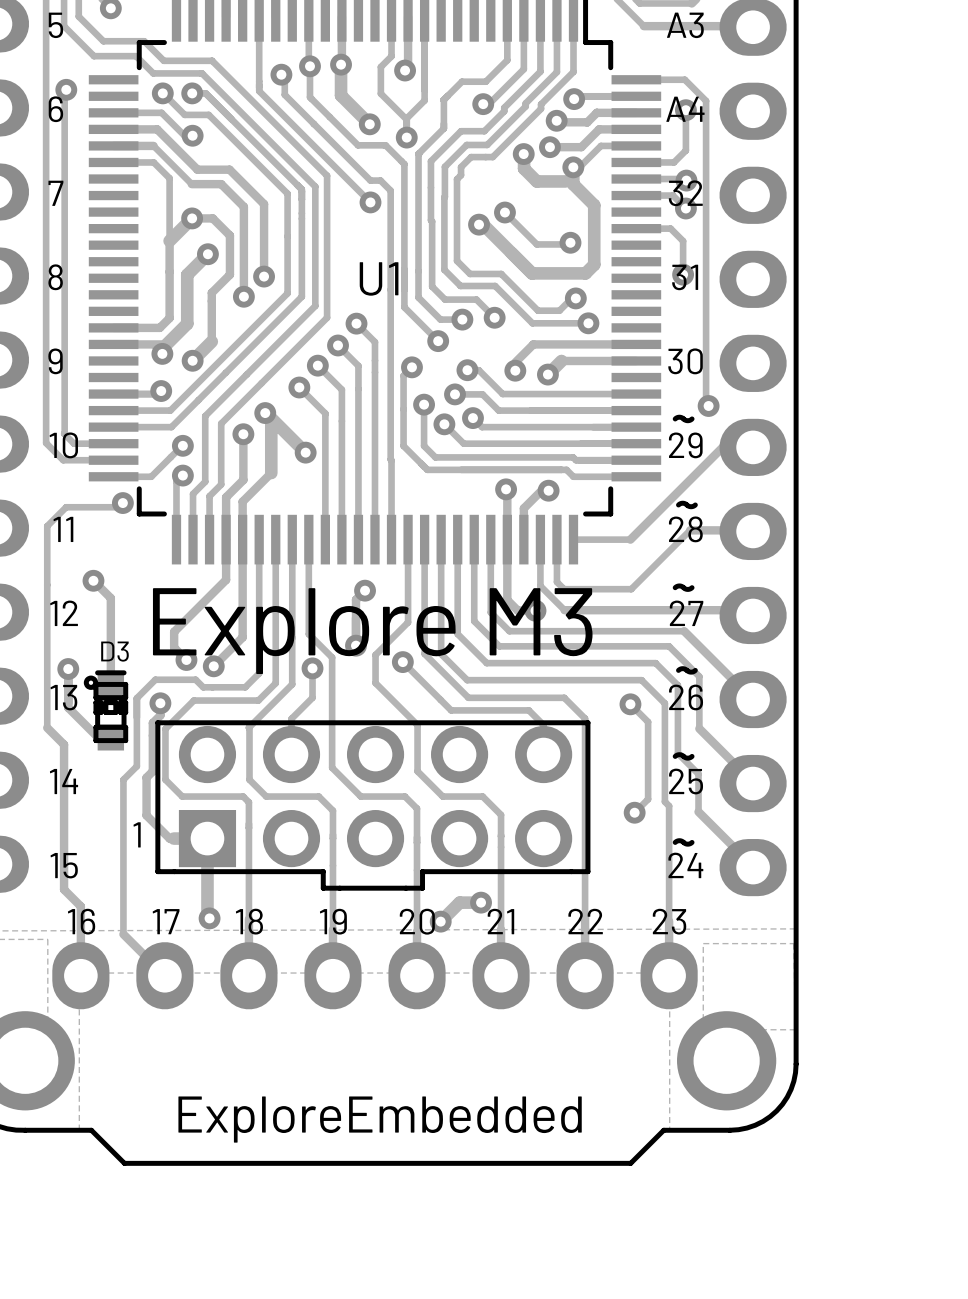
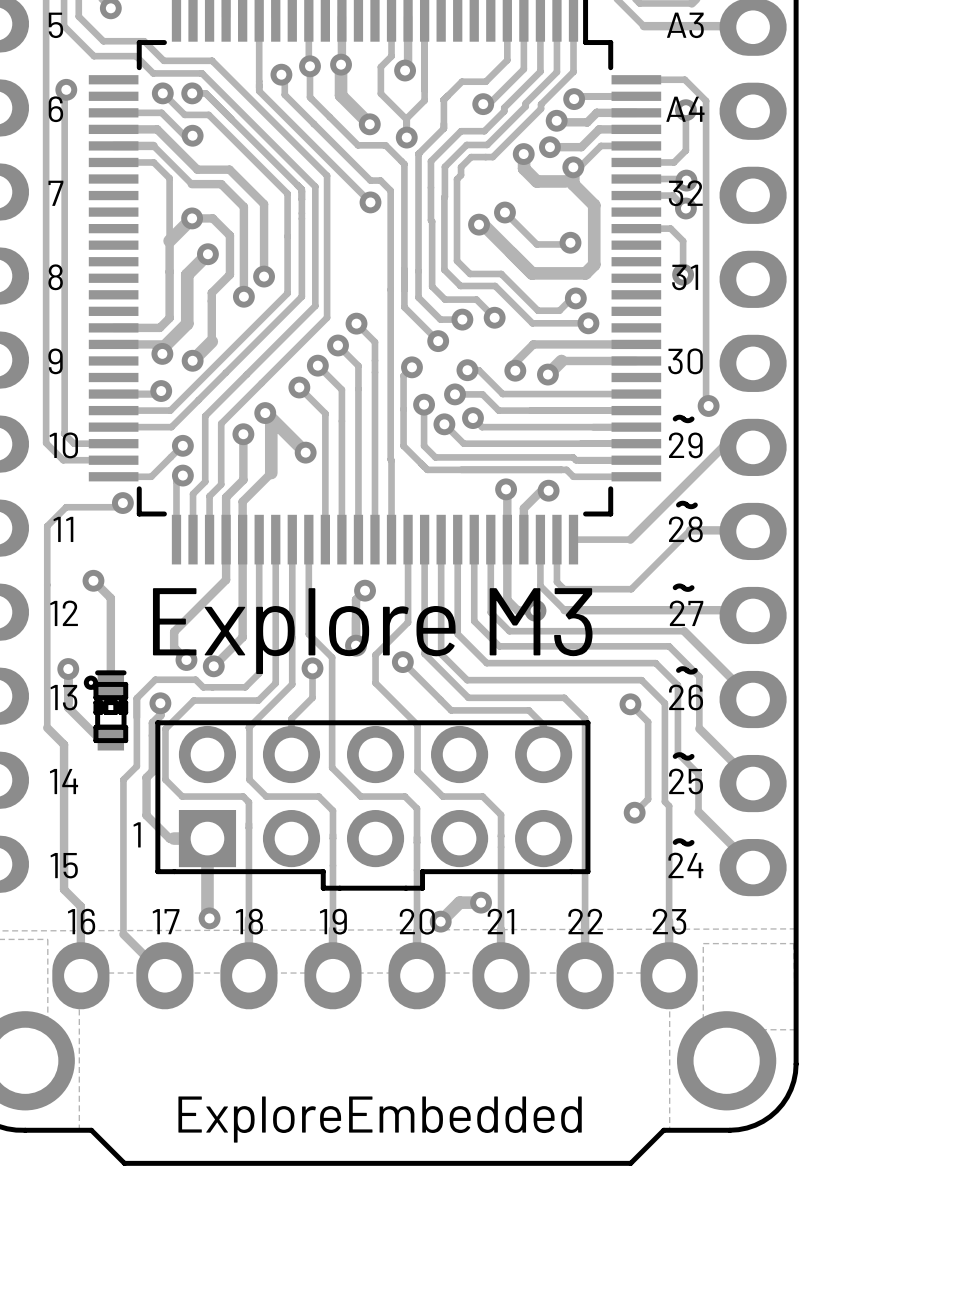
U1 name: U1 (379, 278) -> none
D3 name: D3 (114, 651) -> none

